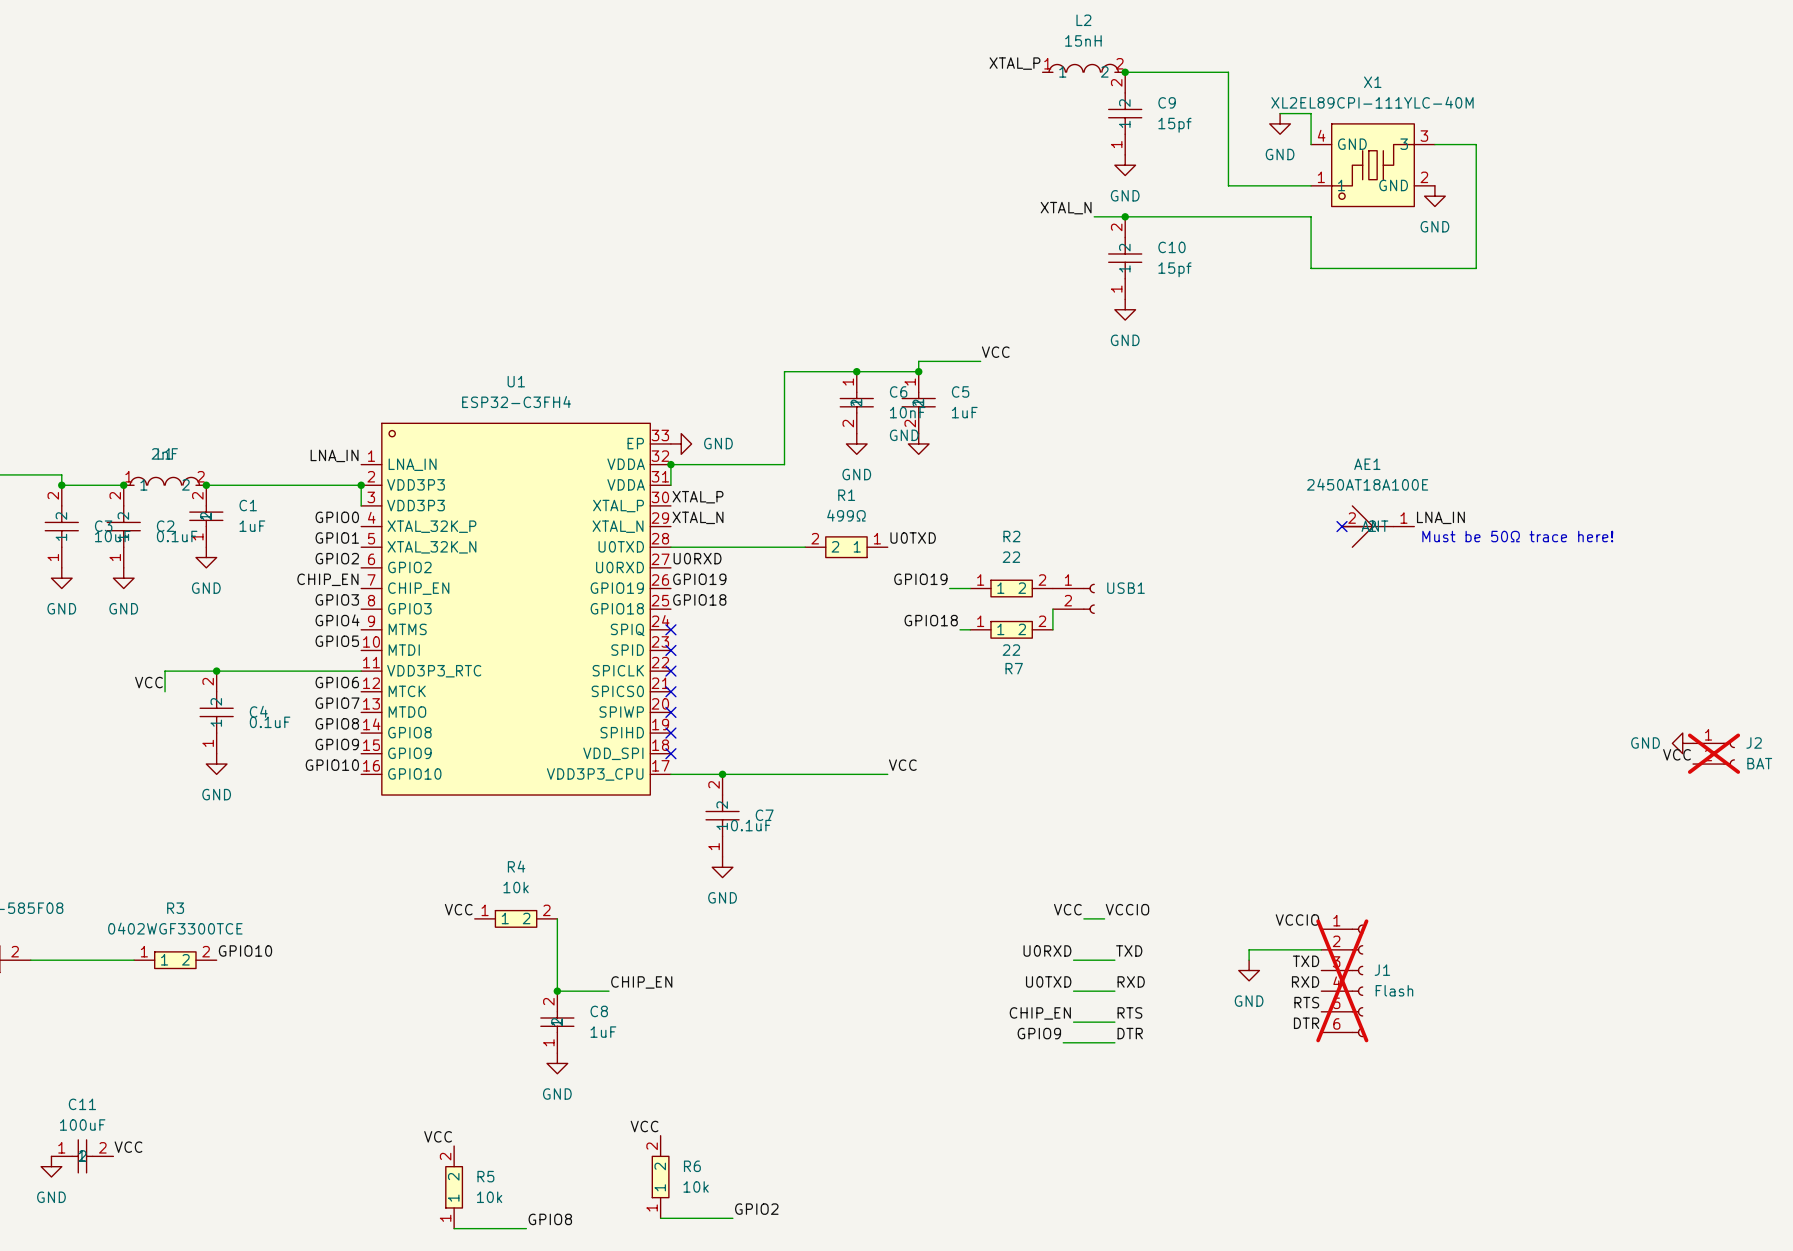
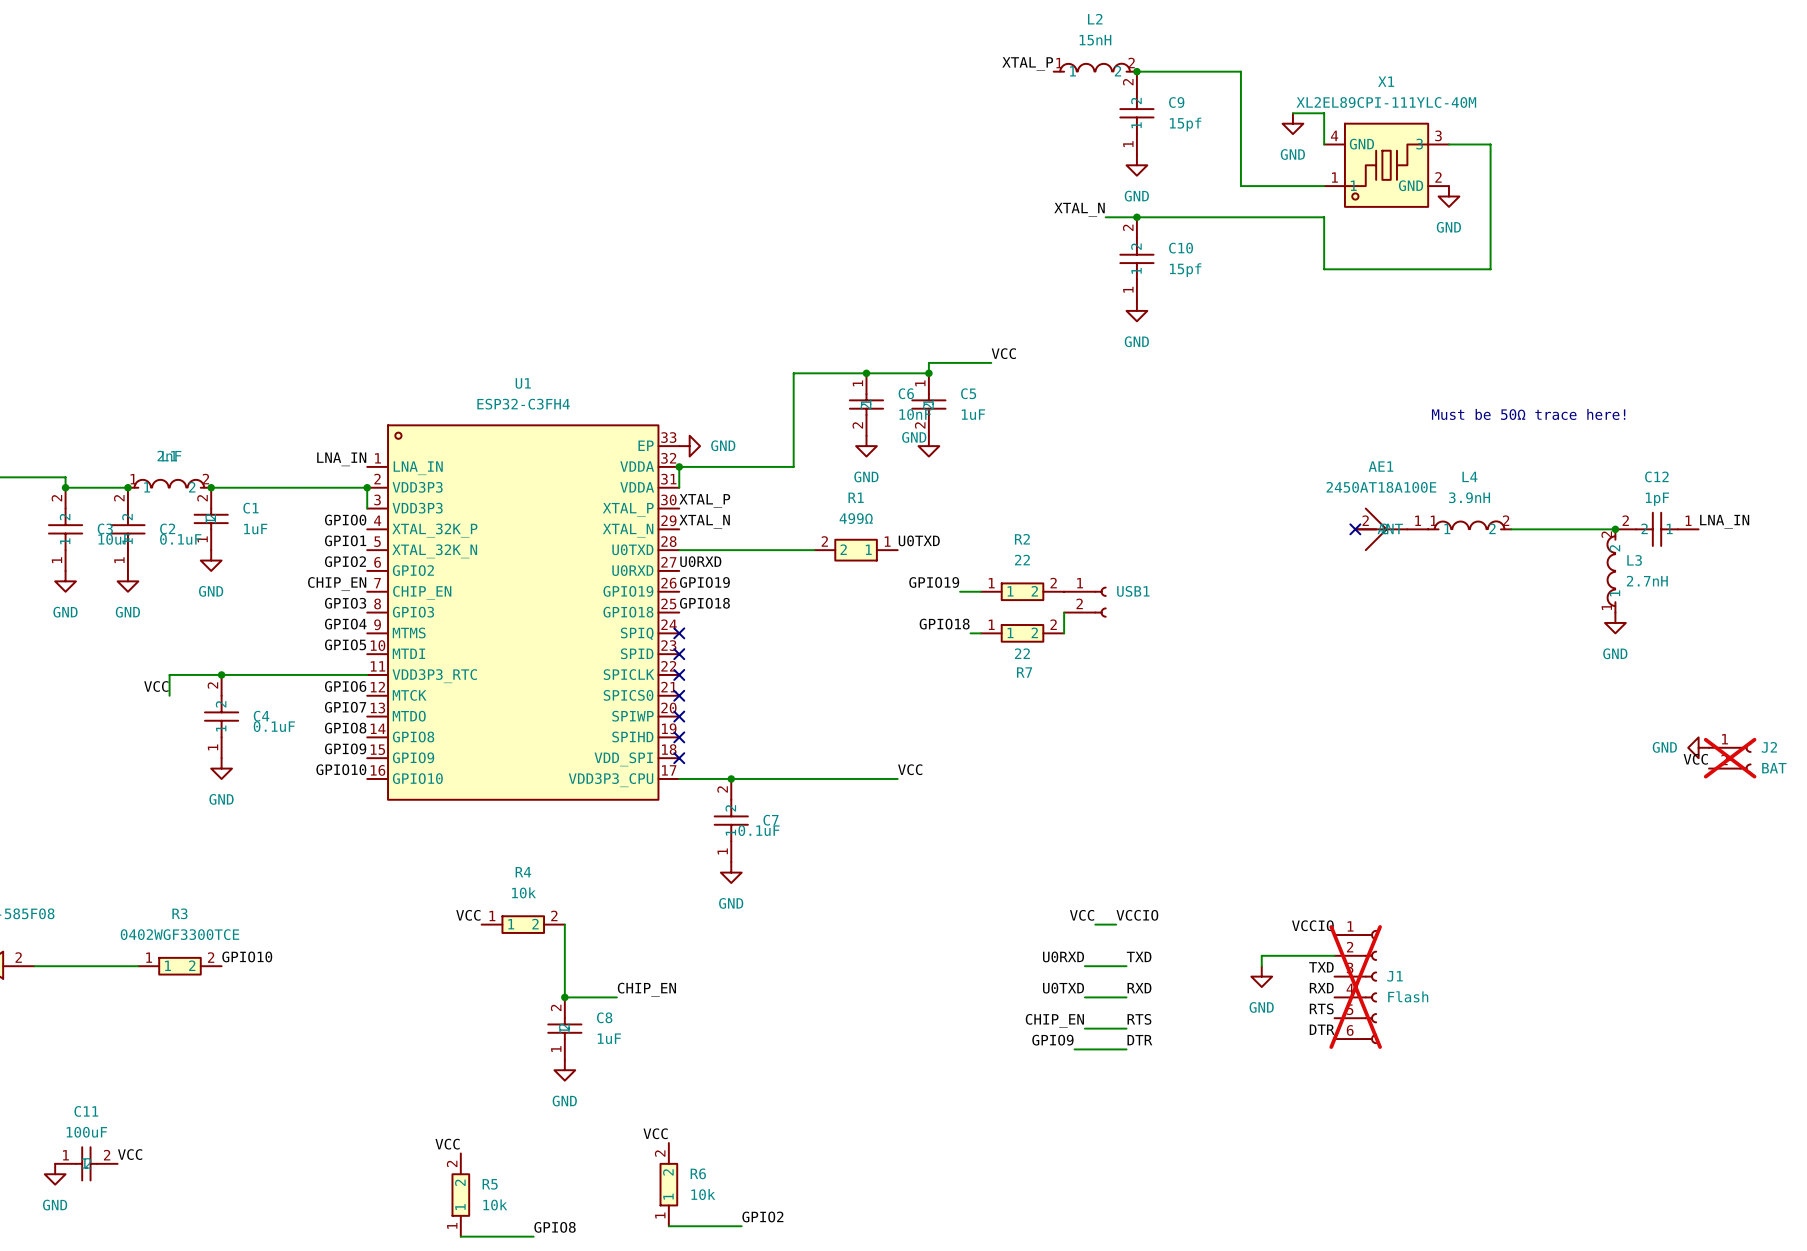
label: LNA_IN (1440, 517) -> none
label: none -> LNA_IN (1724, 521)
L4: none -> 3.9nH (1469, 525)
wire: none -> (1511, 529) (1615, 529)
junction: none -> (1615, 529)
C12: none -> 1pF (1657, 529)
text position: Must be 50Ω trace here! (1517, 536) -> Must be 50Ω trace here! (1528, 414)
L3: none -> 2.7nH (1611, 570)
power symbol: none -> GND (1615, 622)

